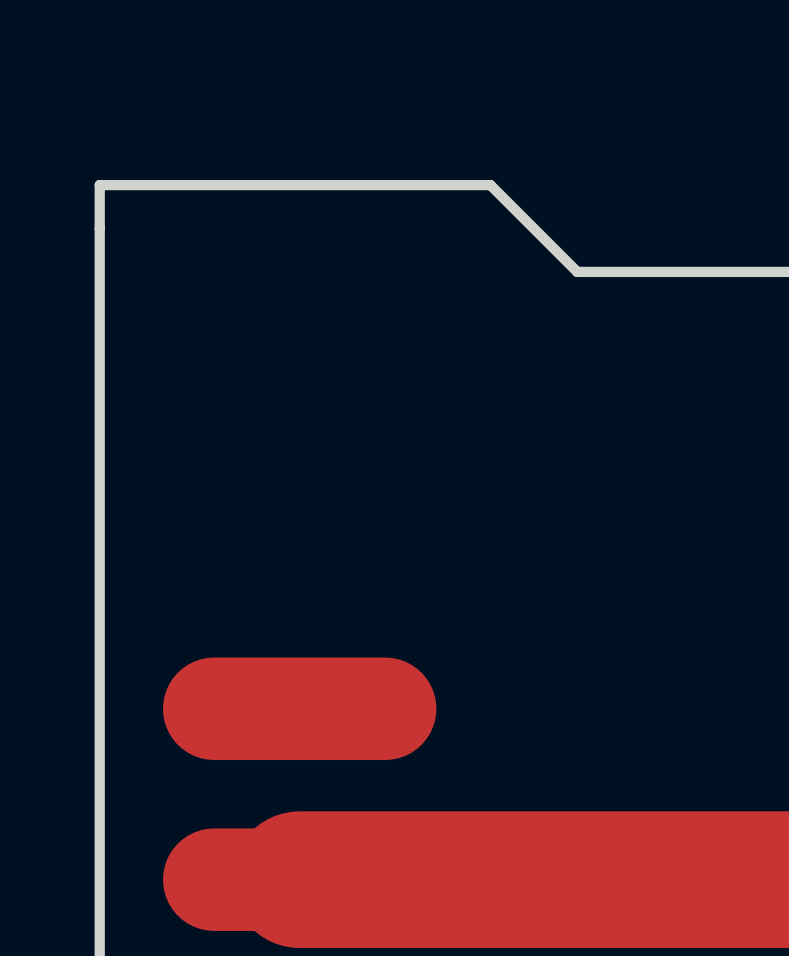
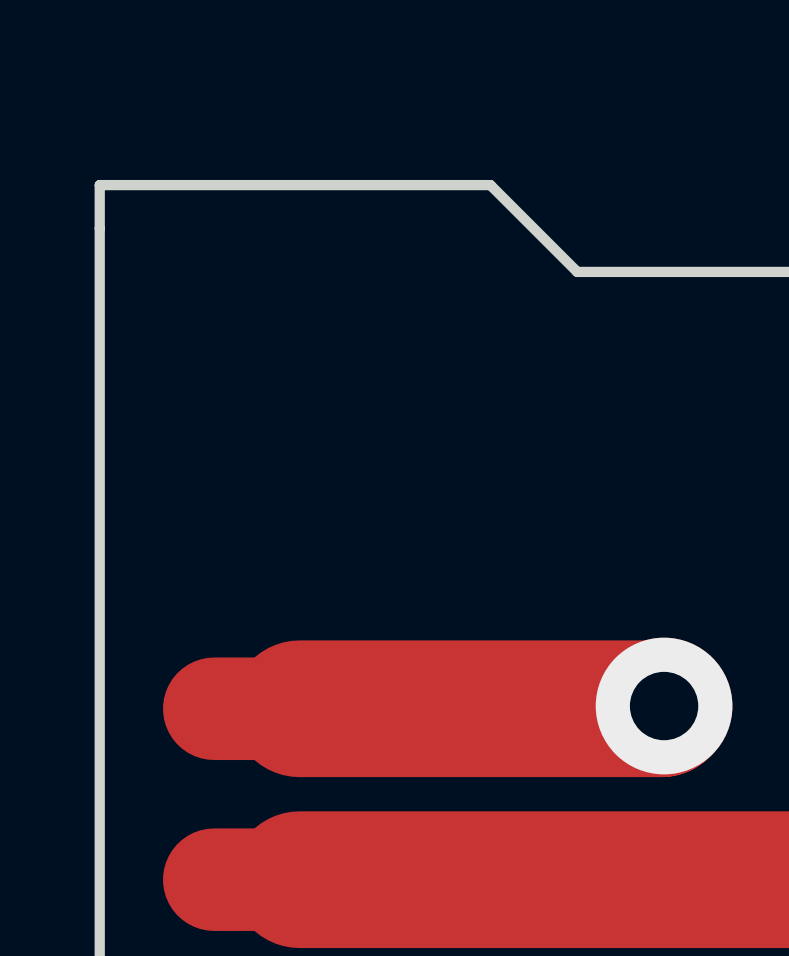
top track: none -> (664, 706) (661, 708) (299, 708)
via: none -> (664, 706)

